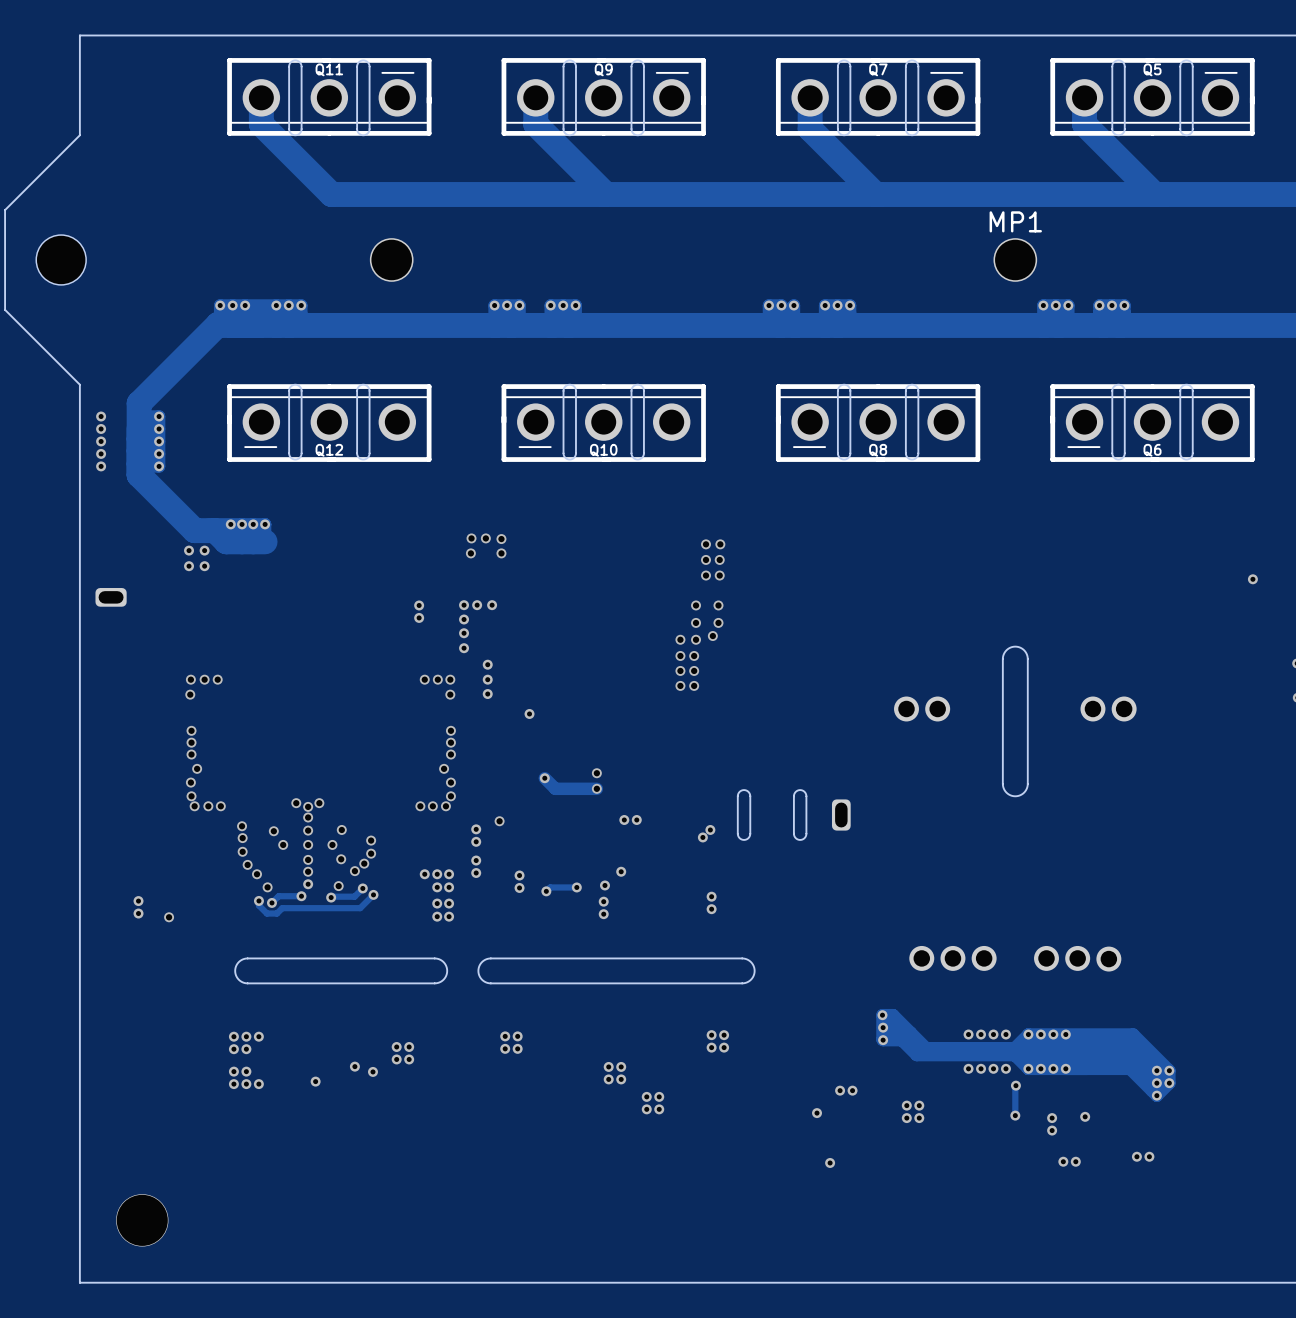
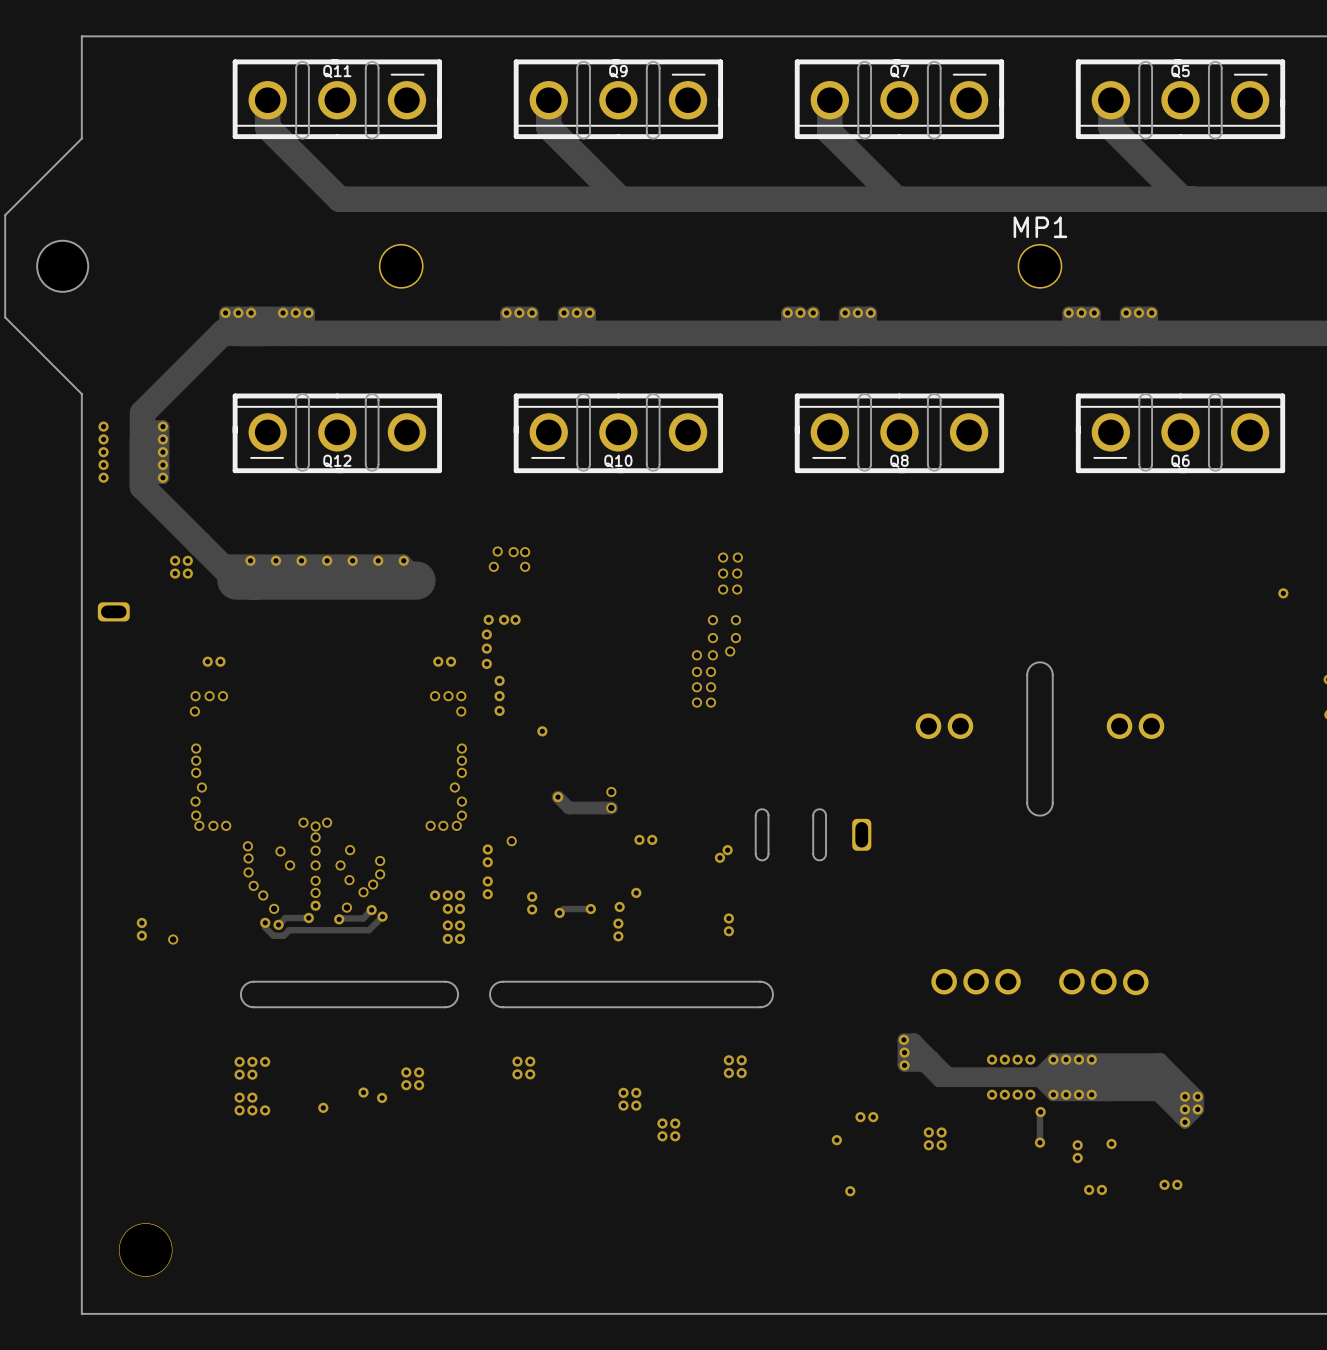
track: (208, 524) (265, 524) (265, 541) (226, 541) (215, 530) (194, 530) -> (216, 560) (403, 560) (416, 573) (416, 580) (236, 580) (199, 543)
via: (230, 524) -> none
via: (242, 524) -> none
via: (253, 524) -> none
via: (265, 524) -> none
via: (471, 538) -> none
via: none -> (525, 552)
via: none -> (175, 560)
via: none -> (187, 560)
via: none -> (250, 560)
via: none -> (276, 560)
via: none -> (301, 560)
via: none -> (327, 560)
via: none -> (352, 560)
via: none -> (378, 560)
via: none -> (403, 560)
via: (189, 550) -> none
via: (204, 550) -> none
via: (470, 553) -> none
via: none -> (493, 566)
via: (501, 553) -> none
via: none -> (525, 566)
via: none -> (175, 573)
via: none -> (187, 573)
via: (189, 566) -> none
via: (204, 566) -> none
via: (419, 605) -> none
via: (464, 605) -> none
via: none -> (515, 619)
via: (419, 617) -> none
via: (464, 619) -> none
via: none -> (486, 634)
via: (464, 633) -> none
via: none -> (486, 648)
via: none -> (207, 661)
via: none -> (220, 661)
via: none -> (438, 661)
via: none -> (451, 661)
via: (464, 648) -> none
via: none -> (486, 663)

